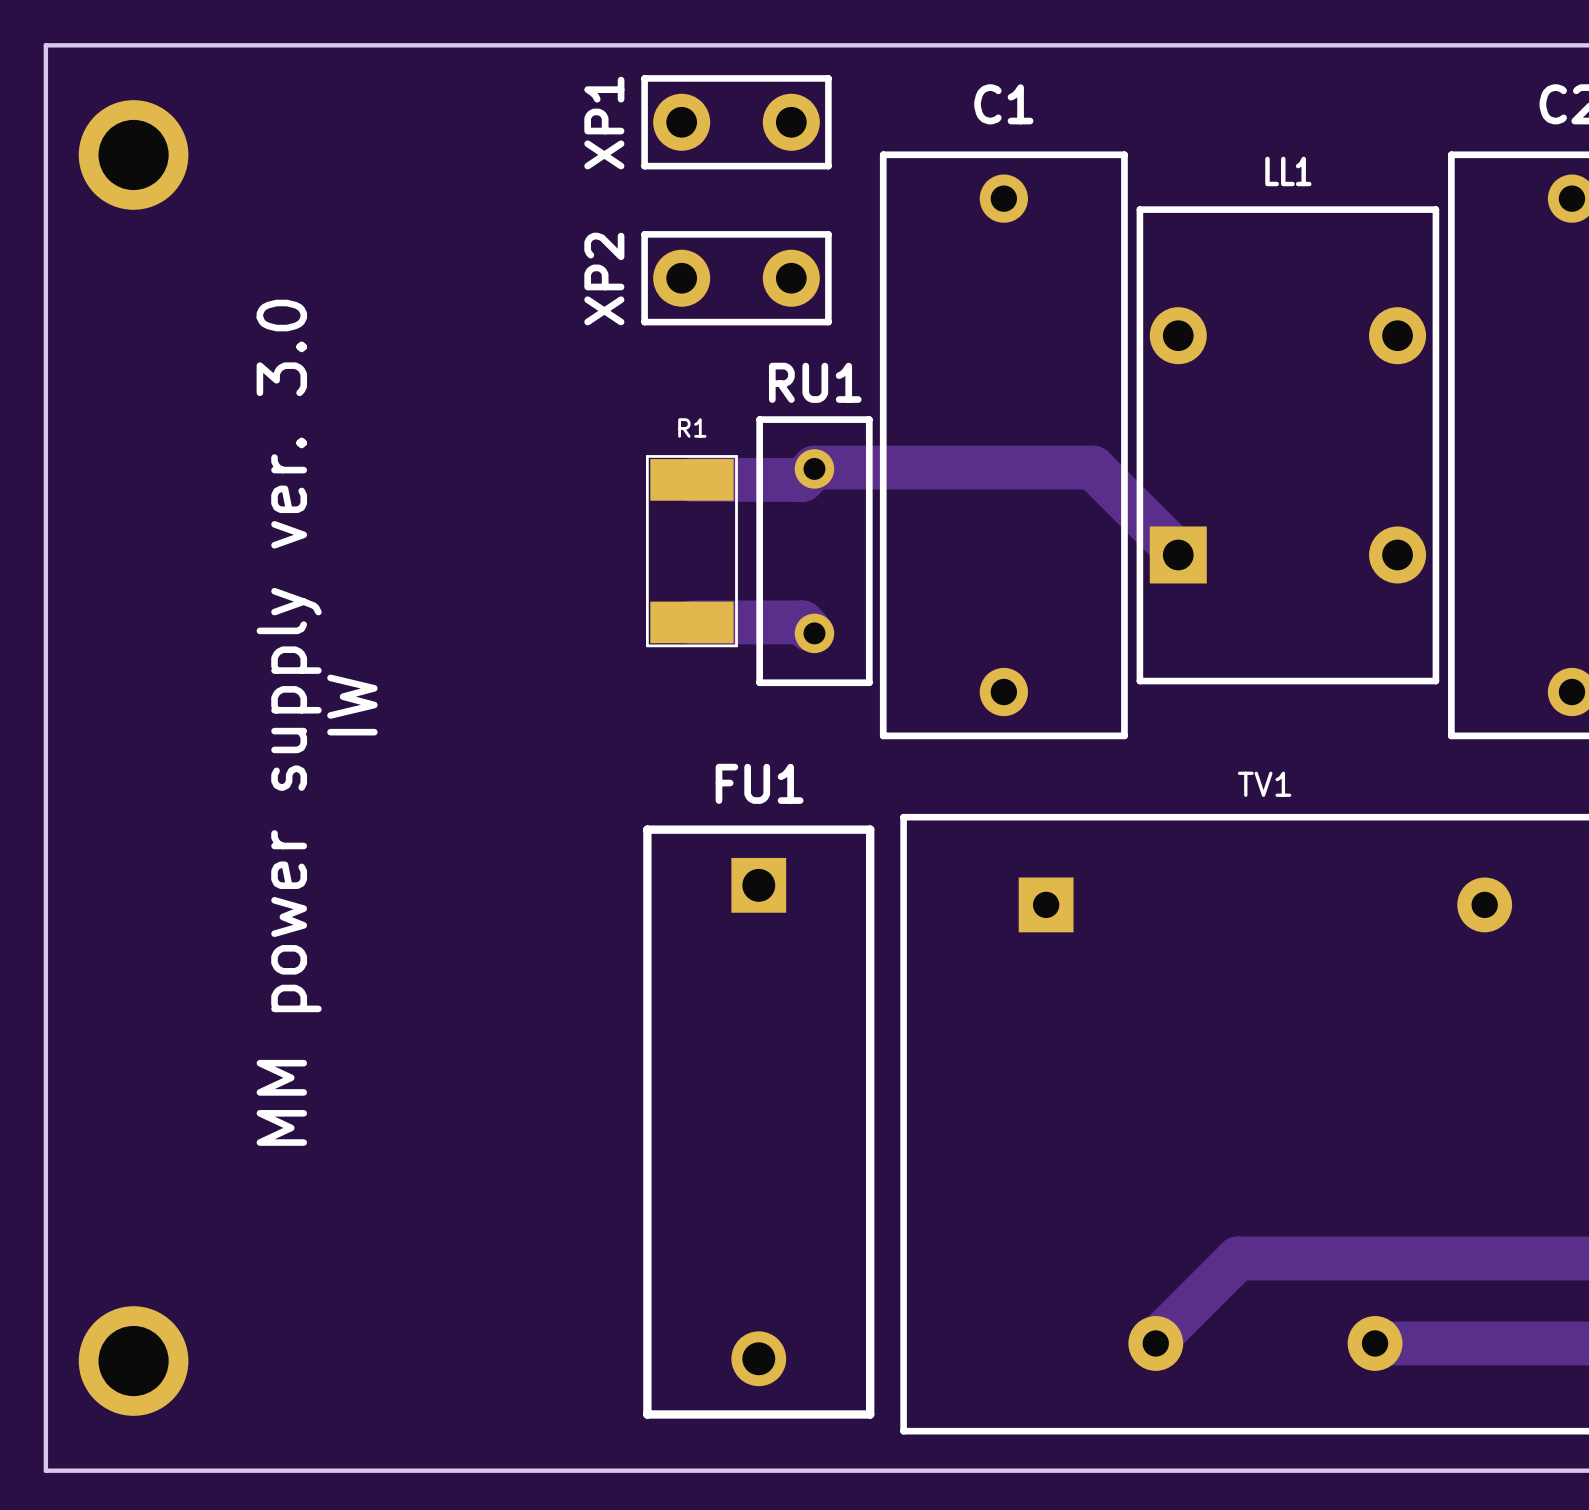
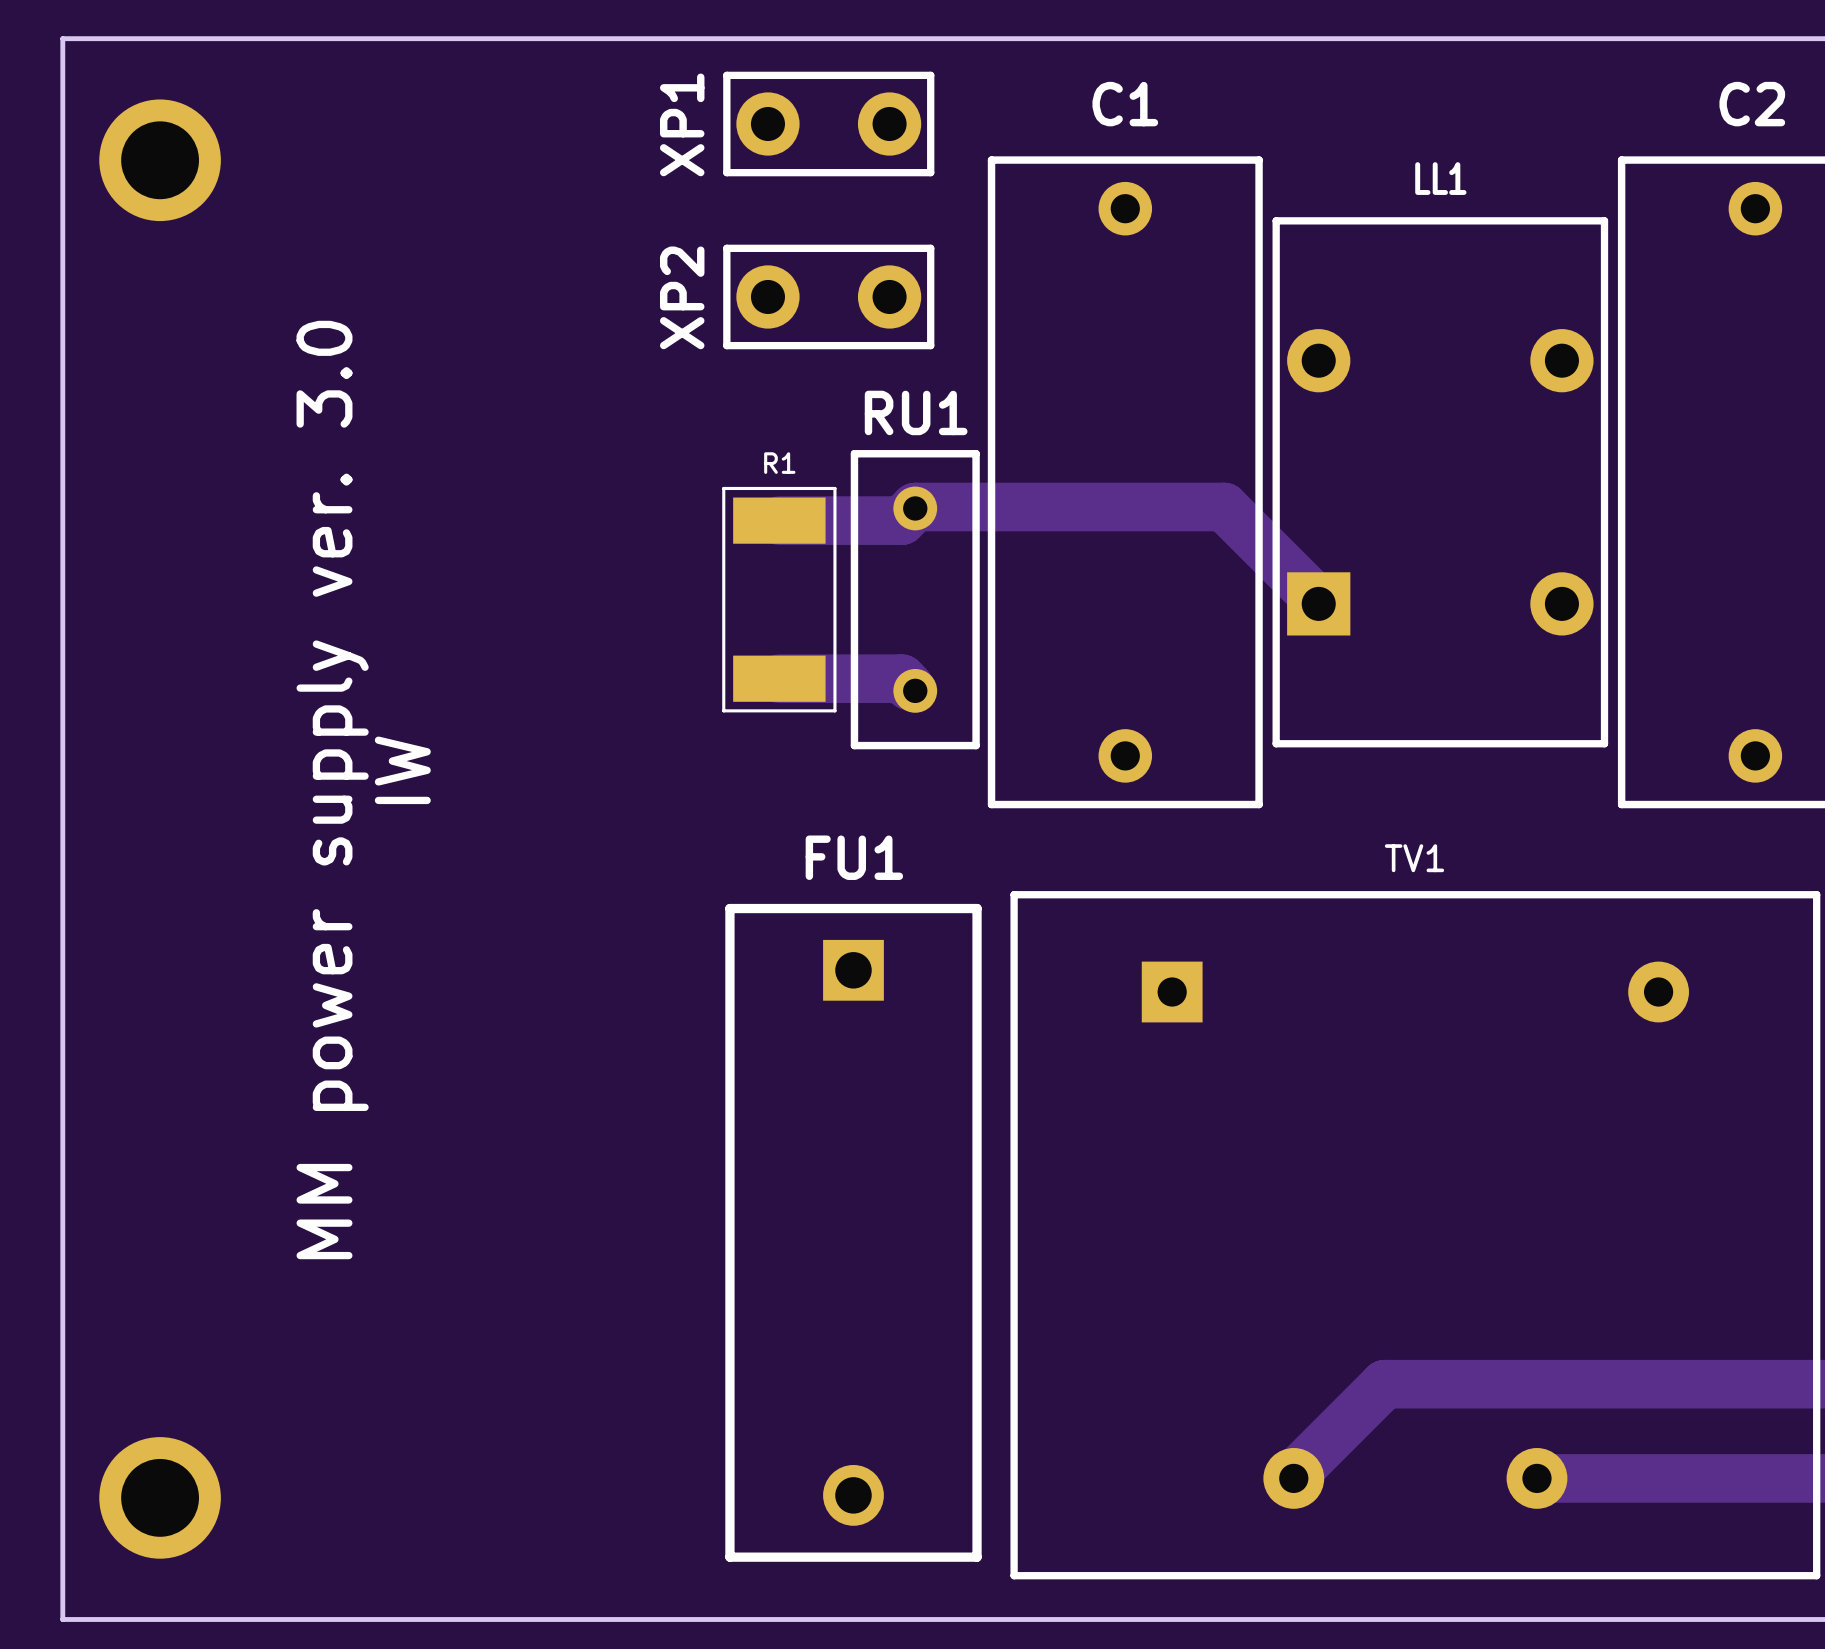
R1 footprint: [645, 455, 738, 648] -> [722, 486, 837, 713]

